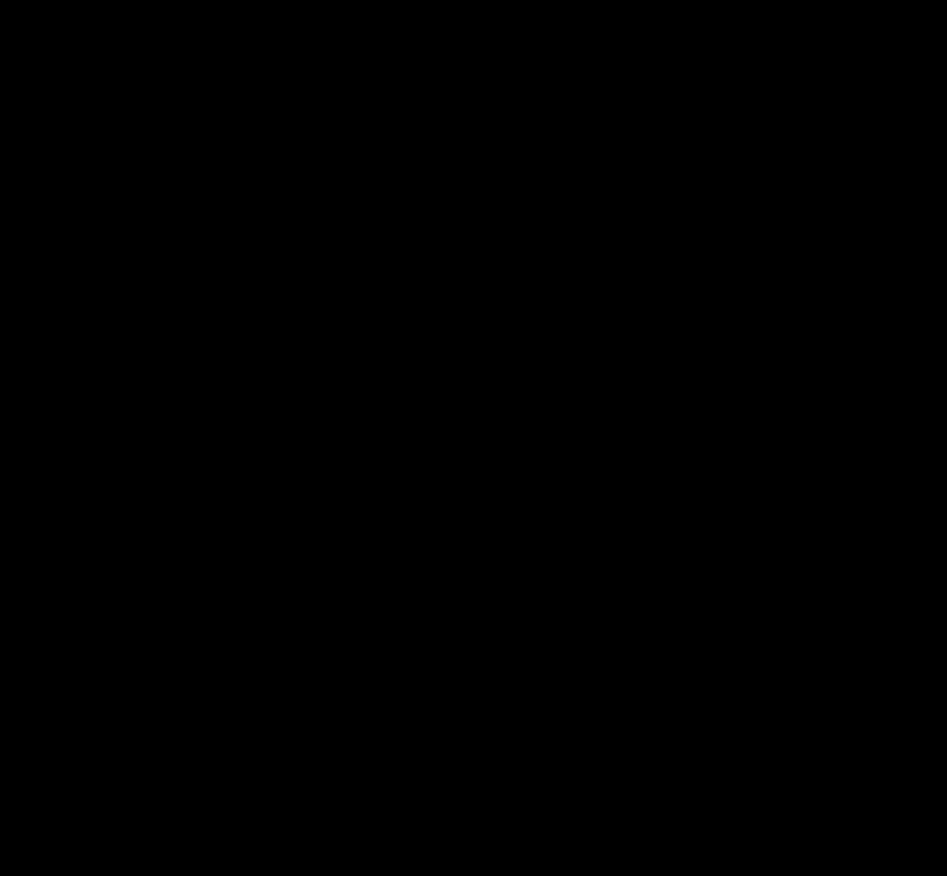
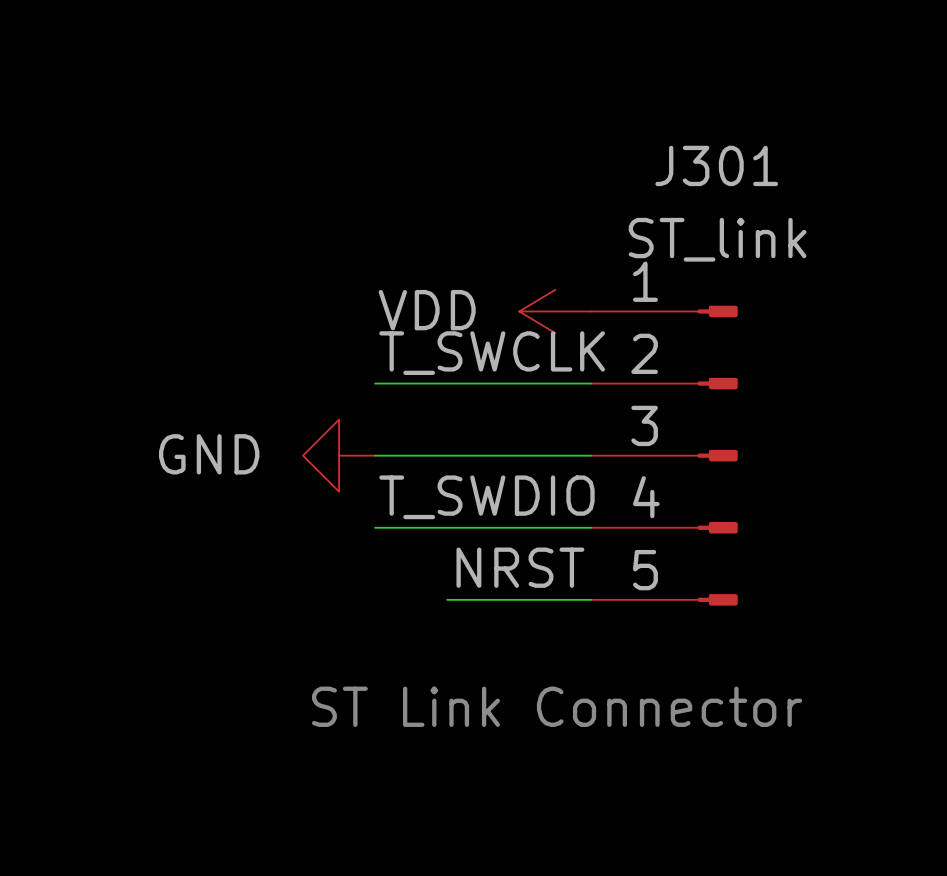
power symbol: none -> VDD (555, 311)
label: none -> T_SWCLK (492, 353)
wire: none -> (375, 383) (591, 383)
power symbol: none -> GND (339, 455)
wire: none -> (375, 455) (591, 455)
J301: none -> ST_link (664, 455)
label: none -> T_SWDIO (486, 497)
wire: none -> (375, 527) (591, 527)
label: none -> NRST (520, 567)
wire: none -> (447, 599) (591, 599)
text: none -> ST Link Connector (557, 706)

